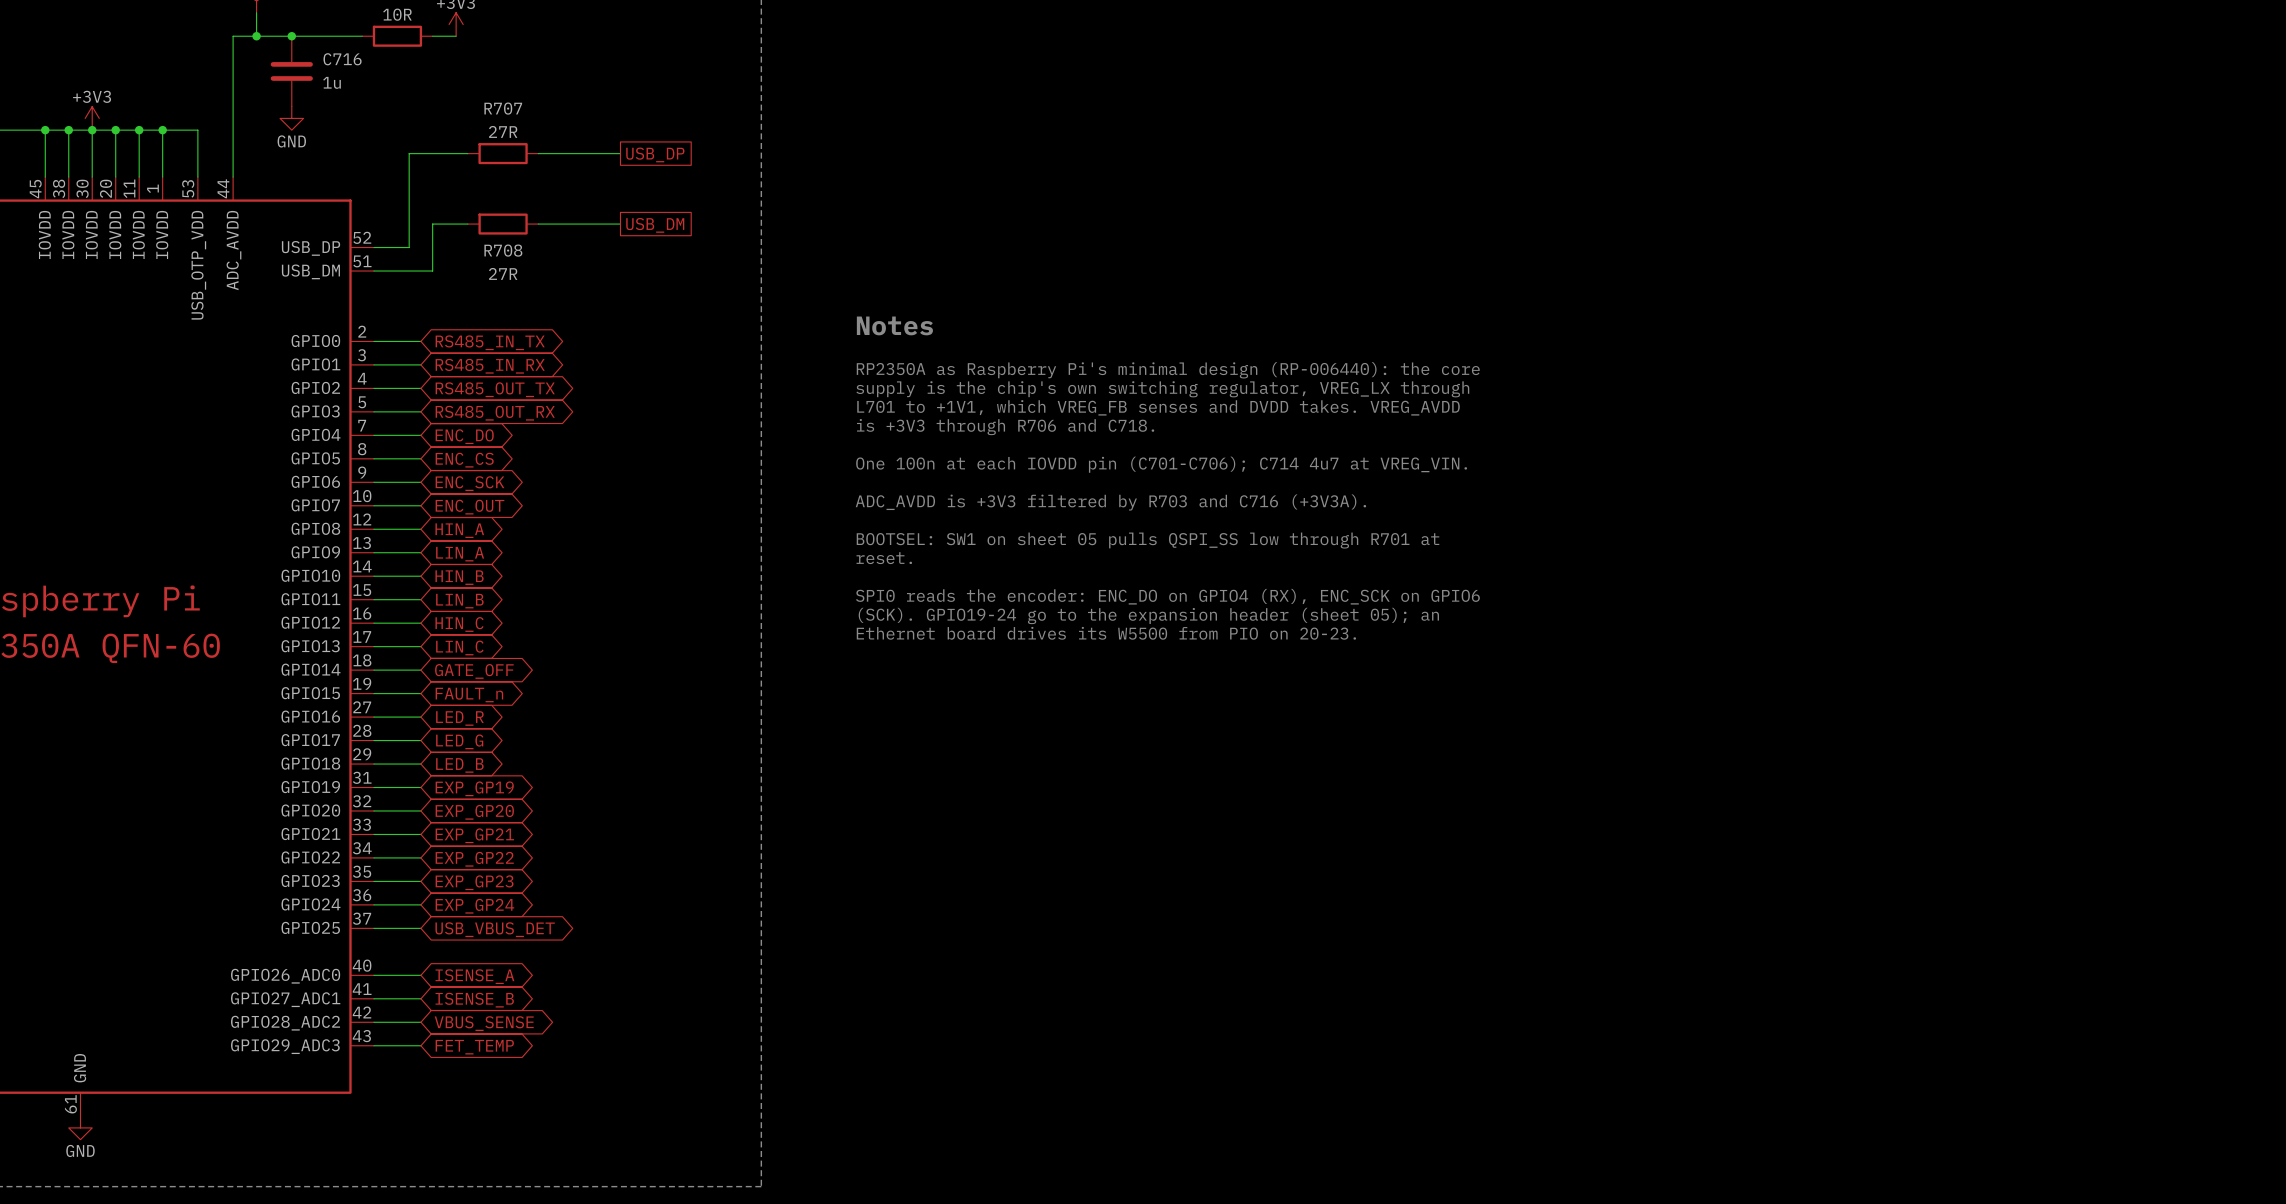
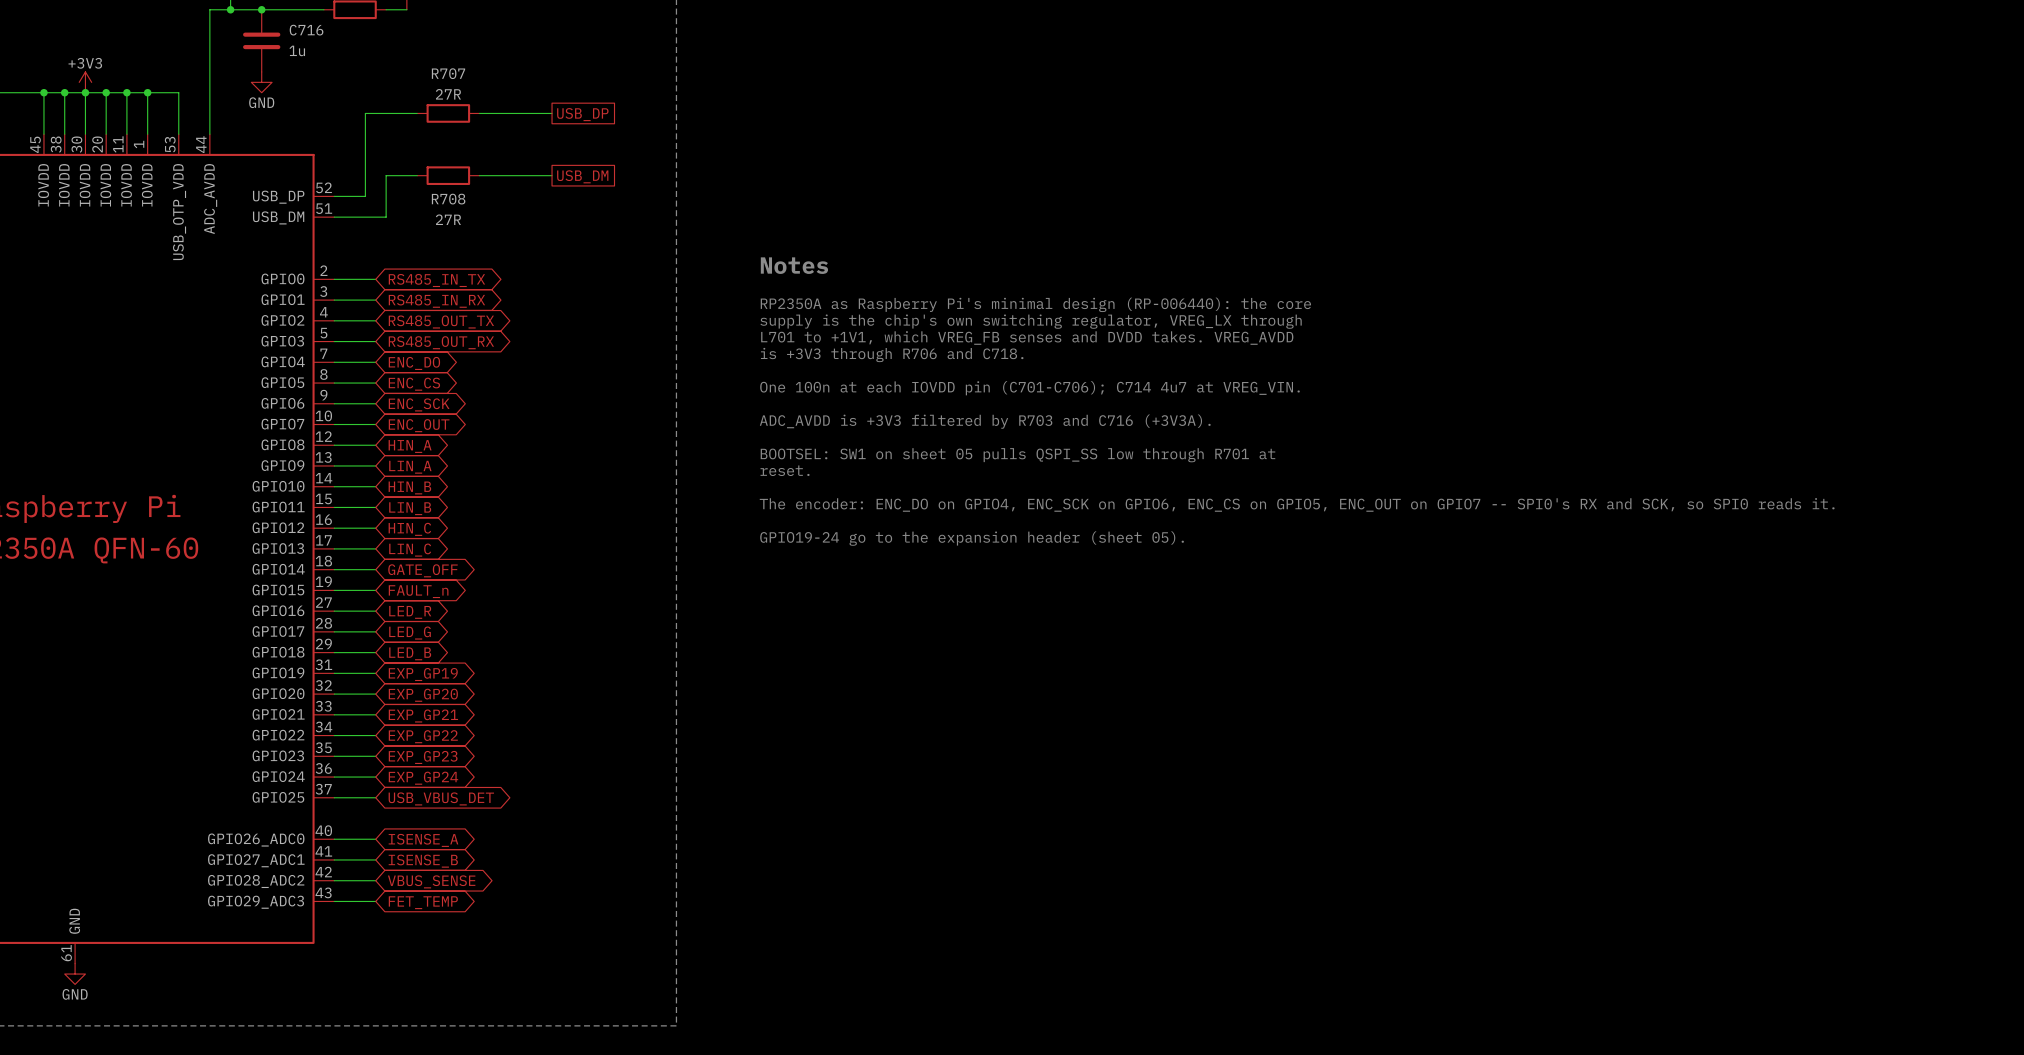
text: SPI0 reads the encoder: ENC_DO on GPIO4 (RX), ENC_SCK on GPIO6 (1167, 596) -> The encoder: ENC_DO on GPIO4, ENC_SCK on GPIO6, ENC_CS on GPIO5, ENC_OUT on GPIO7 -- SPI0's RX and SCK, so SPI0 reads it. (1297, 504)
text: (SCK). GPIO19-24 go to the expansion header (sheet 05); an (1148, 615) -> none
text: Ethernet board drives its W5500 from PIO on 20-23. (1106, 633) -> GPIO19-24 go to the expansion header (sheet 05). (972, 538)

